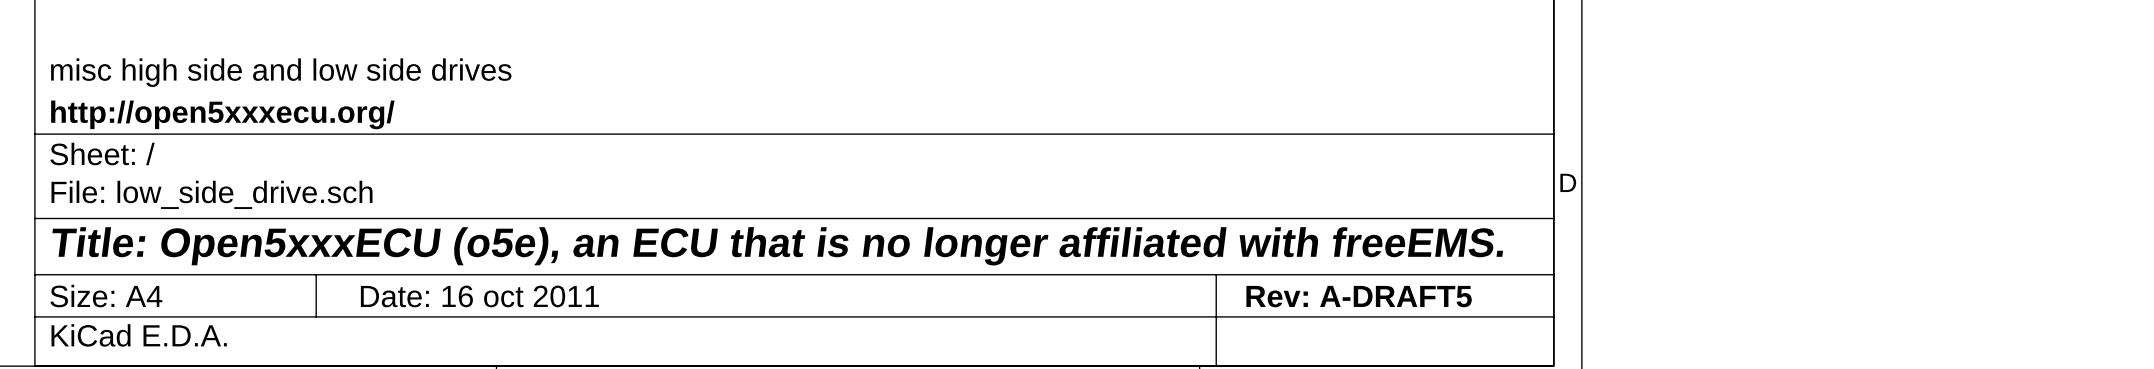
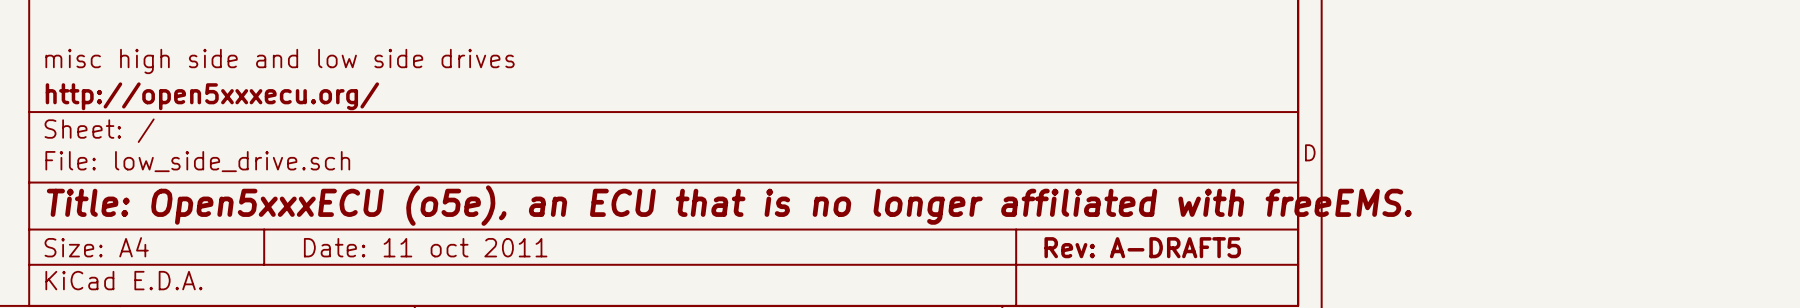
title block: Date: 16 oct 2011 (479, 296) -> Date: 11 oct 2011 (425, 247)

